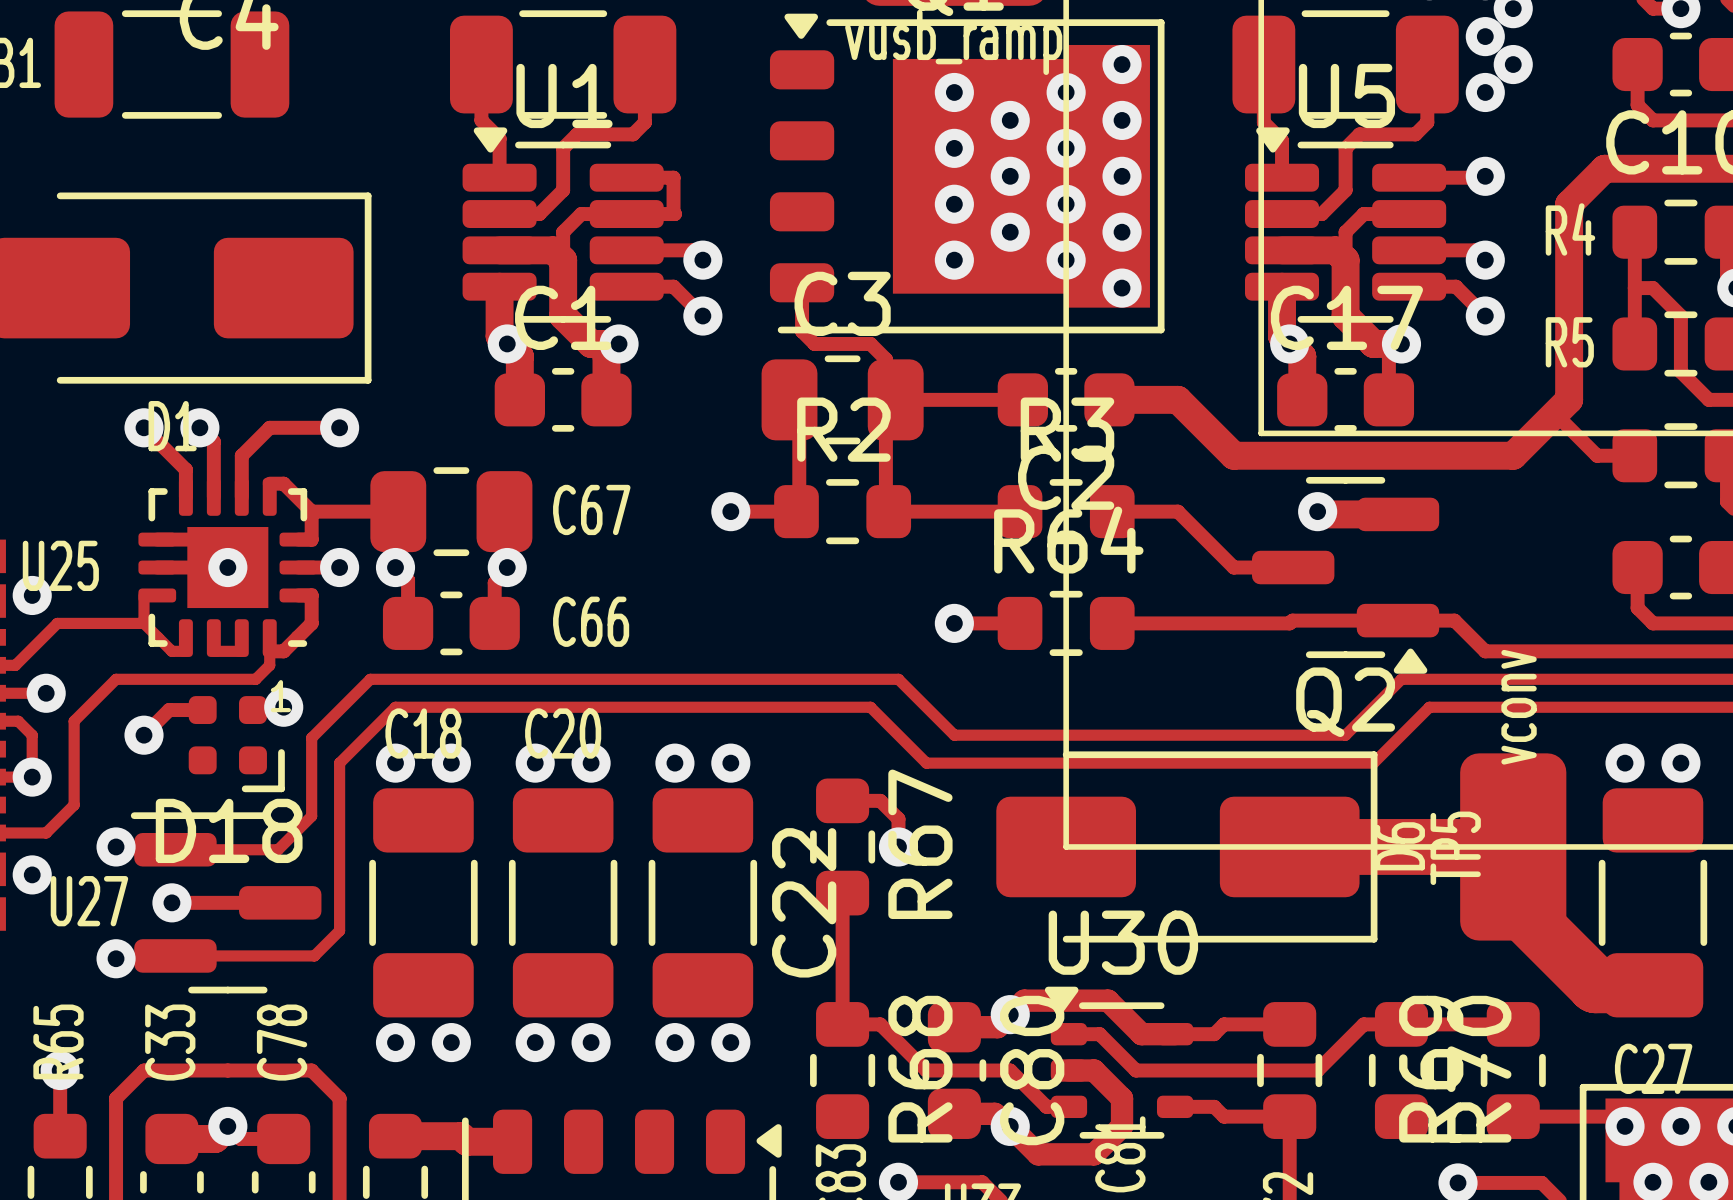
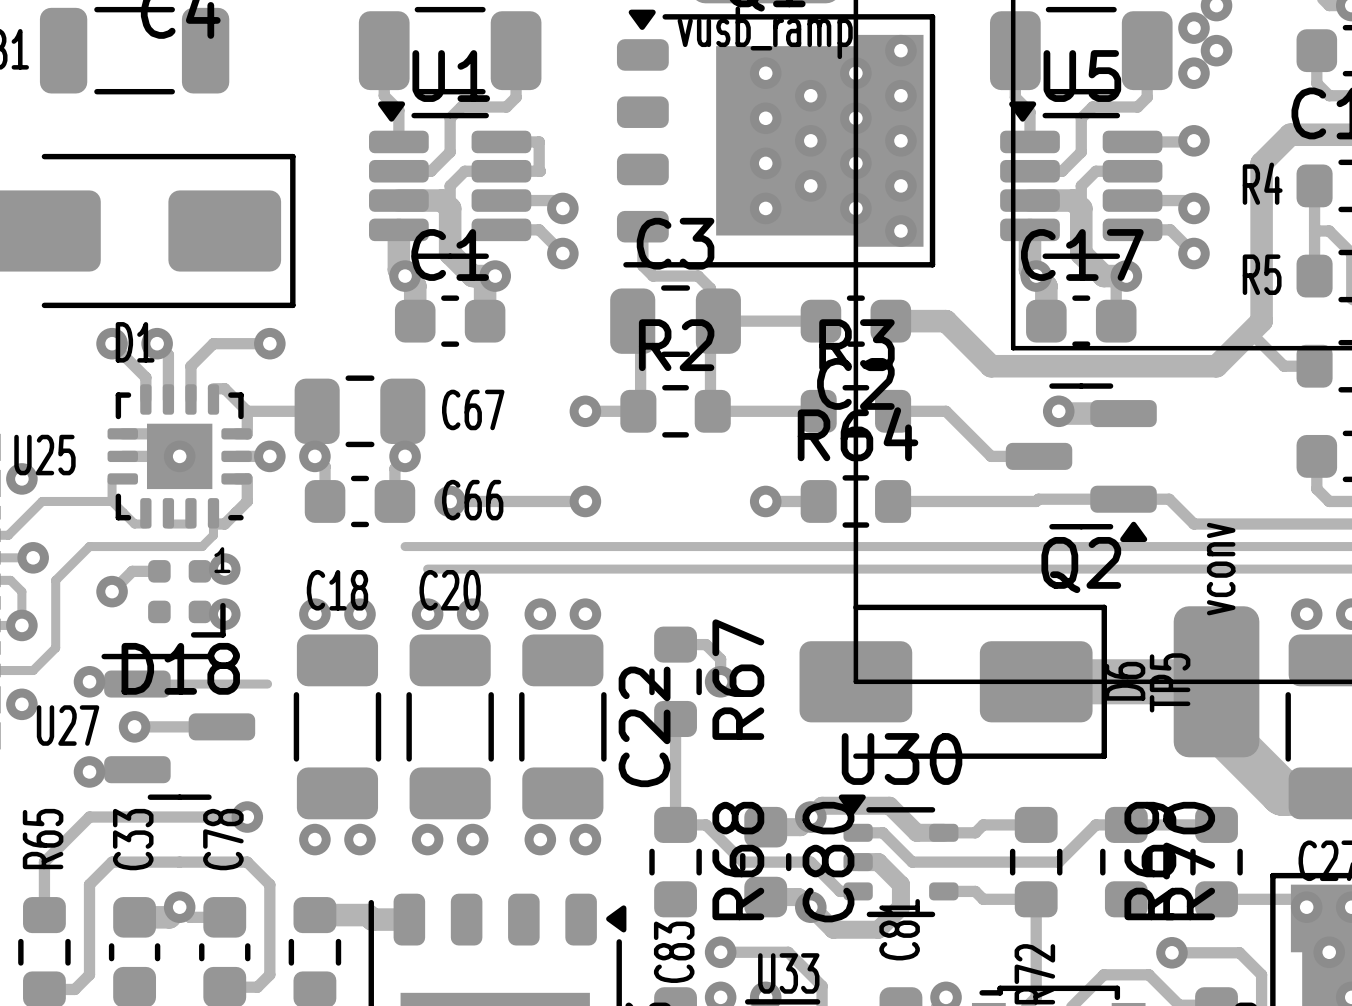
track: none -> (450, 501) (585, 501)
via: none -> (450, 501)
via: none -> (585, 501)
track: (507, 679) (370, 679) (311, 737) (311, 816) (278, 849) -> (267, 684) (220, 684)
track: (898, 679) (954, 735) (1345, 735) (1401, 679) -> (720, 546) (1126, 546)
track: (535, 707) (395, 707) (339, 763) (339, 930) (314, 955) (175, 955) -> none
track: (870, 707) (926, 763) (1373, 763) (1429, 707) -> (698, 569) (1148, 569)
via: none -> (224, 614)
track: none -> (247, 817) (89, 817) (44, 862)
via: none -> (247, 817)
via: (60, 1070) -> none

